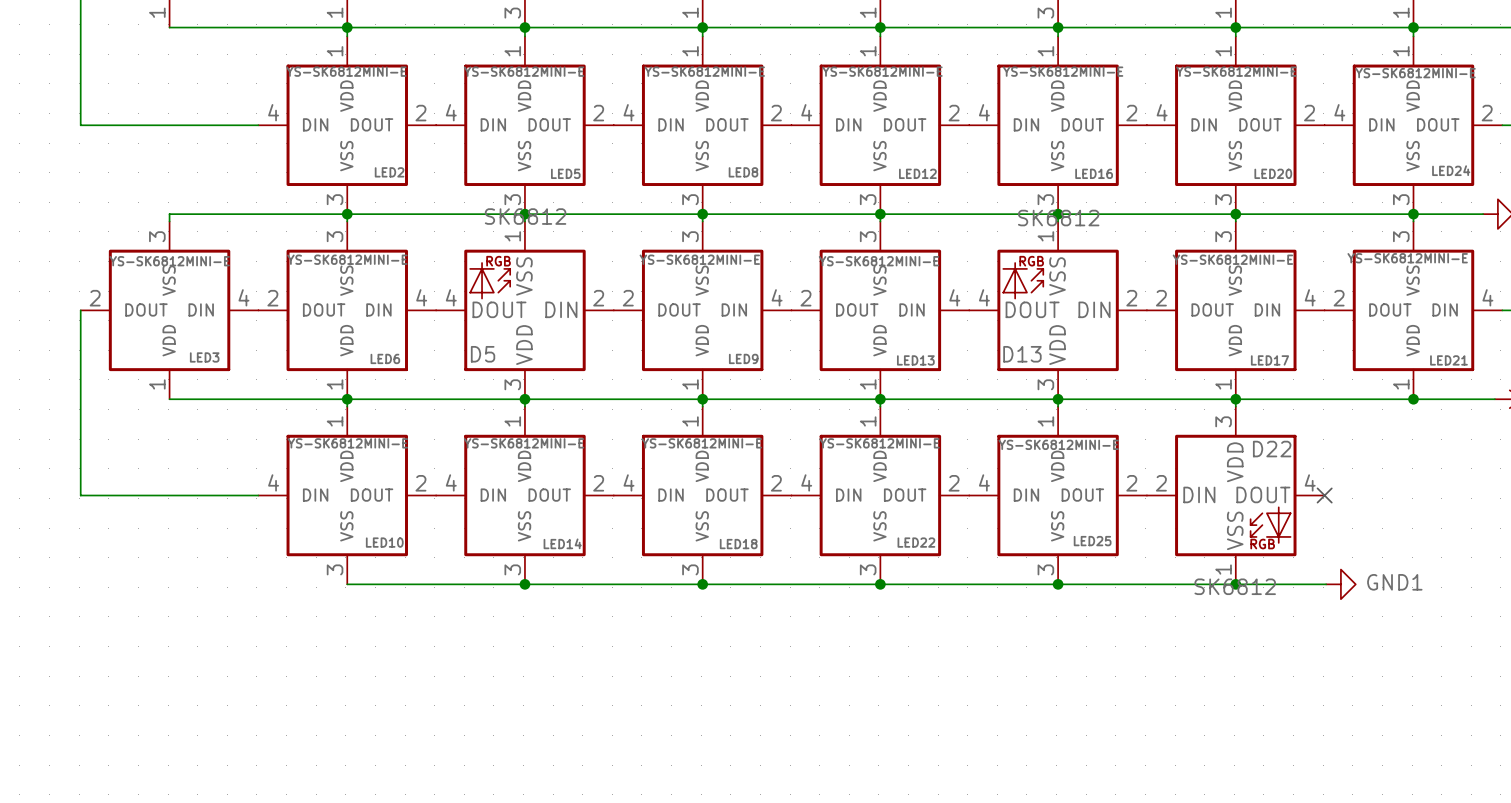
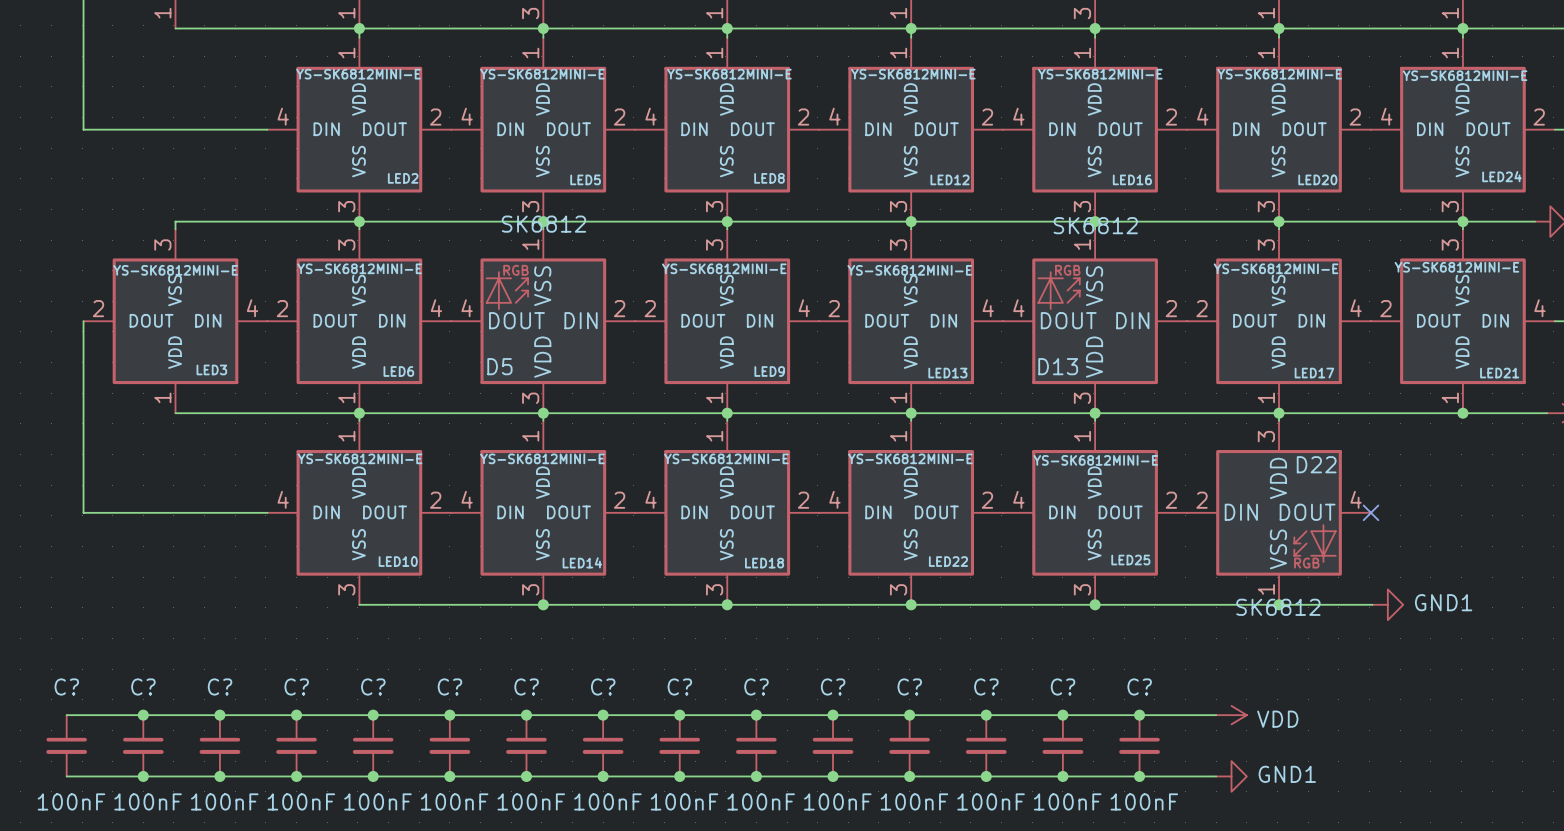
wire: none -> (66, 715) (1216, 715)
junction: none -> (143, 715)
junction: none -> (219, 715)
junction: none -> (296, 715)
junction: none -> (373, 715)
junction: none -> (449, 715)
junction: none -> (526, 715)
junction: none -> (603, 715)
junction: none -> (679, 715)
junction: none -> (756, 715)
junction: none -> (833, 715)
junction: none -> (909, 715)
junction: none -> (986, 715)
junction: none -> (1062, 715)
junction: none -> (1139, 715)
power symbol: none -> VDD (1231, 715)
C?: none -> 100nF (66, 745)
C?: none -> 100nF (143, 745)
C?: none -> 100nF (219, 745)
C?: none -> 100nF (296, 745)
C?: none -> 100nF (373, 745)
C?: none -> 100nF (449, 745)
C?: none -> 100nF (526, 745)
C?: none -> 100nF (603, 745)
C?: none -> 100nF (679, 745)
C?: none -> 100nF (756, 745)
C?: none -> 100nF (833, 745)
C?: none -> 100nF (909, 745)
C?: none -> 100nF (986, 745)
C?: none -> 100nF (1062, 745)
C?: none -> 100nF (1139, 745)
wire: none -> (66, 776) (1216, 776)
junction: none -> (143, 776)
junction: none -> (219, 776)
junction: none -> (296, 776)
junction: none -> (373, 776)
junction: none -> (449, 776)
junction: none -> (526, 776)
junction: none -> (603, 776)
junction: none -> (679, 776)
junction: none -> (756, 776)
junction: none -> (833, 776)
junction: none -> (909, 776)
junction: none -> (986, 776)
junction: none -> (1062, 776)
junction: none -> (1139, 776)
power symbol: none -> GND1 (1231, 776)

